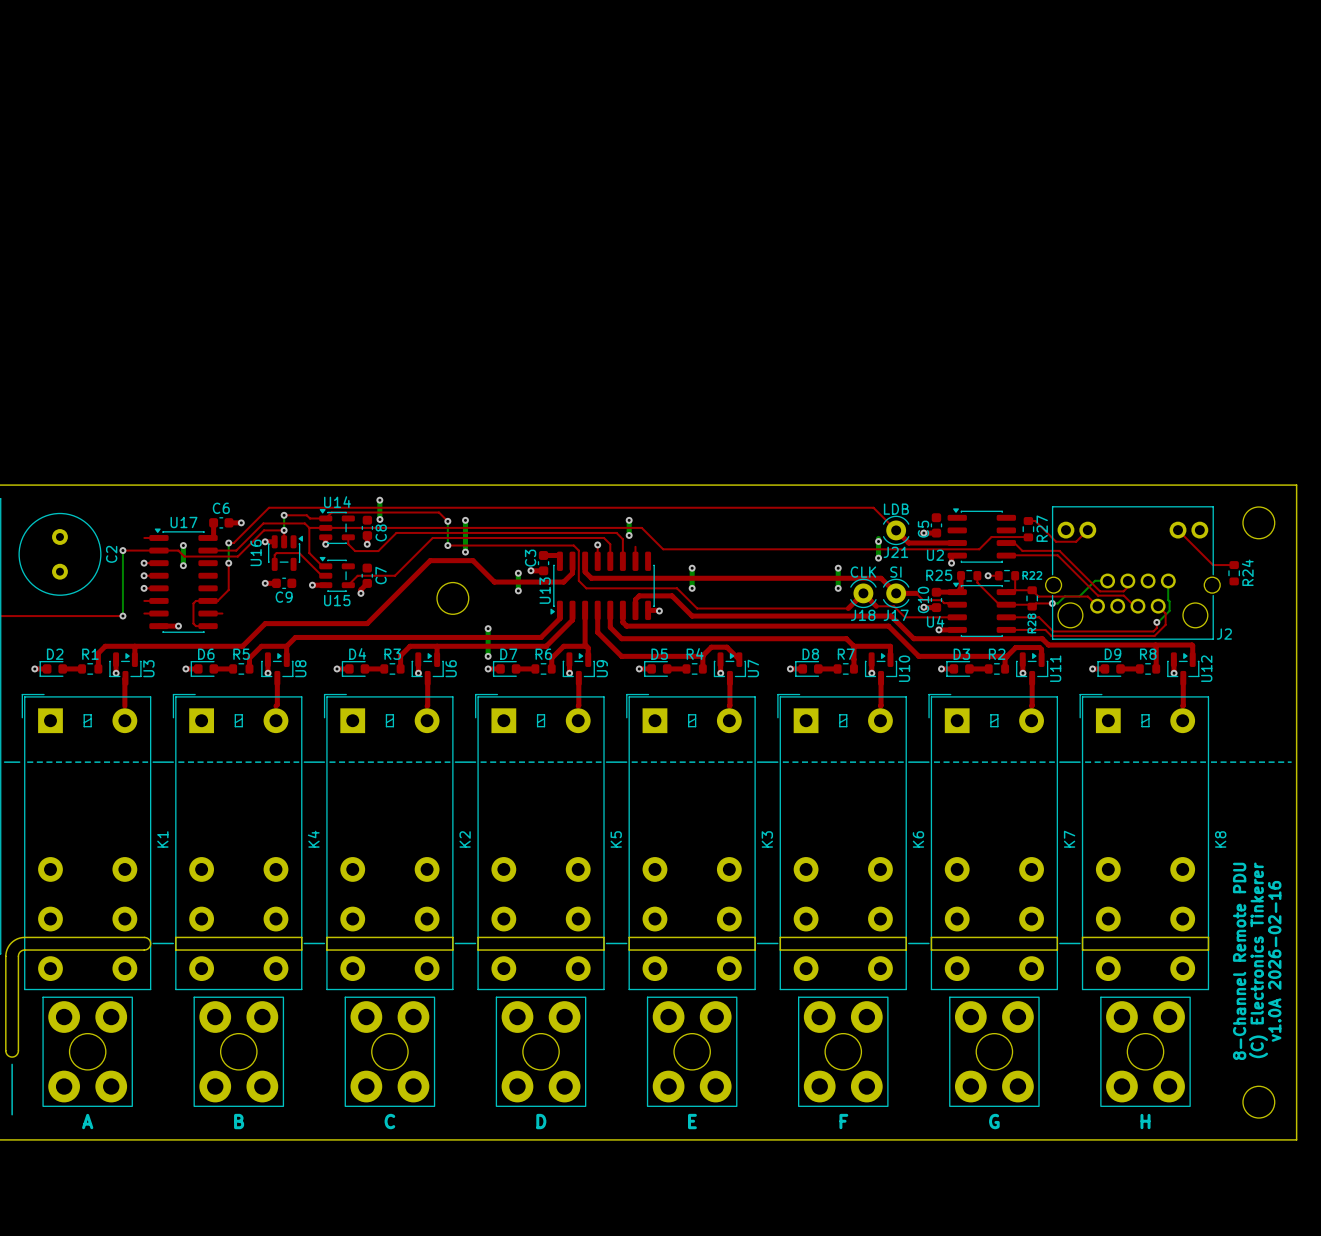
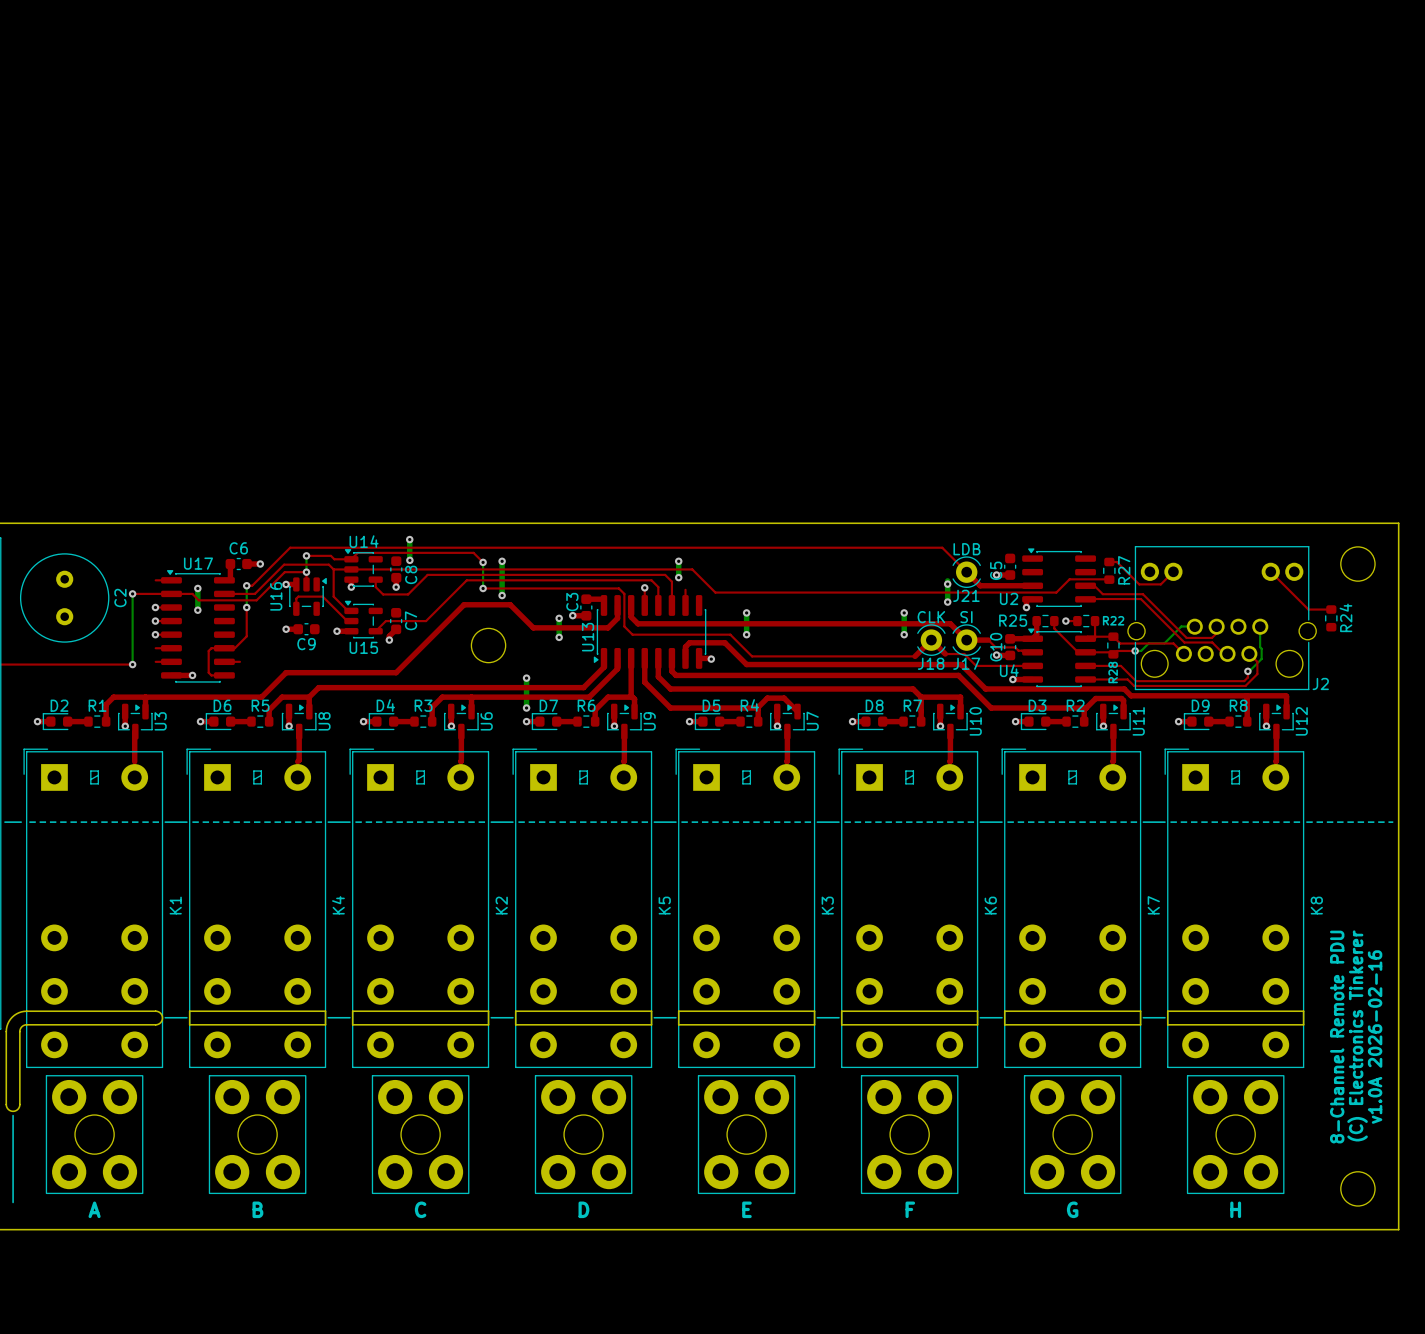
board edge: (5, 956) (5, 1050) (10, 1056) (15, 1056) (18, 1052) (18, 1023) -> (6, 1031) (6, 1104)
board edge: none -> (6, 1104) (8, 1109) (13, 1111) (17, 1109) (19, 1104)
line: none -> (13, 1115) (13, 1148)

